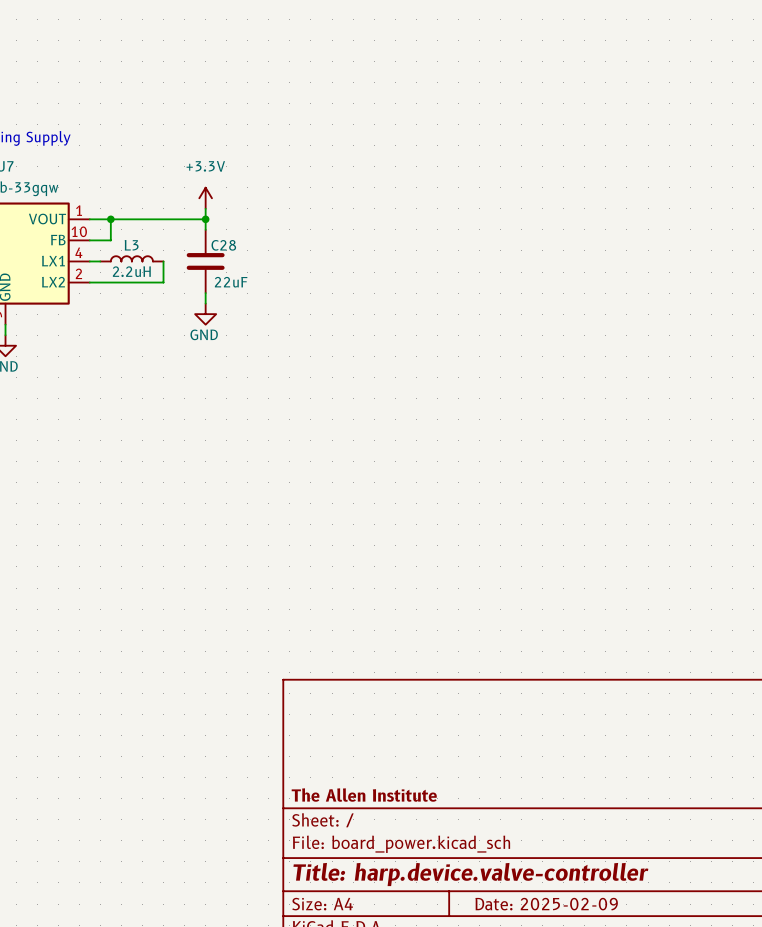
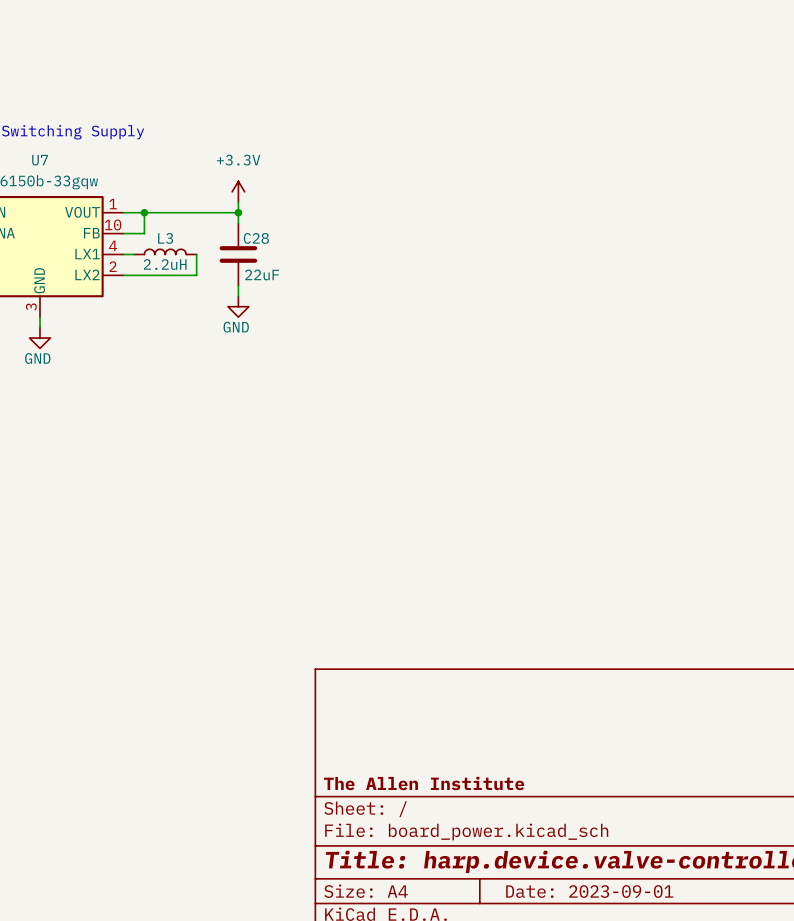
title block: Date: 2025-02-09 (546, 904) -> Date: 2023-09-01 (589, 891)

